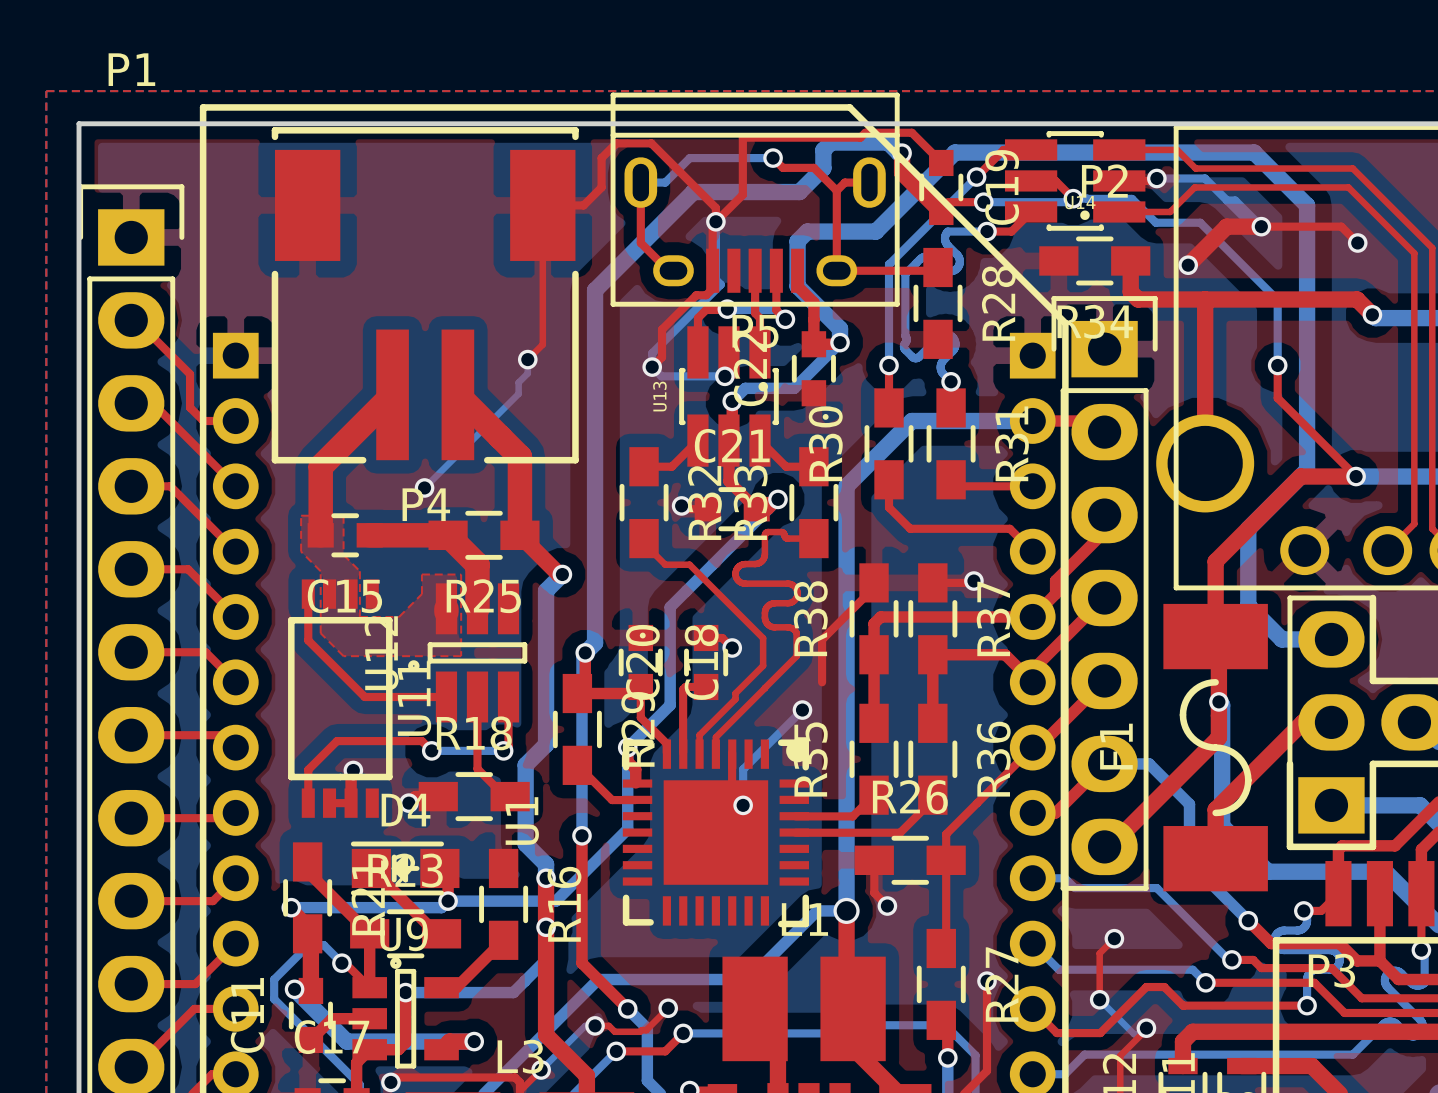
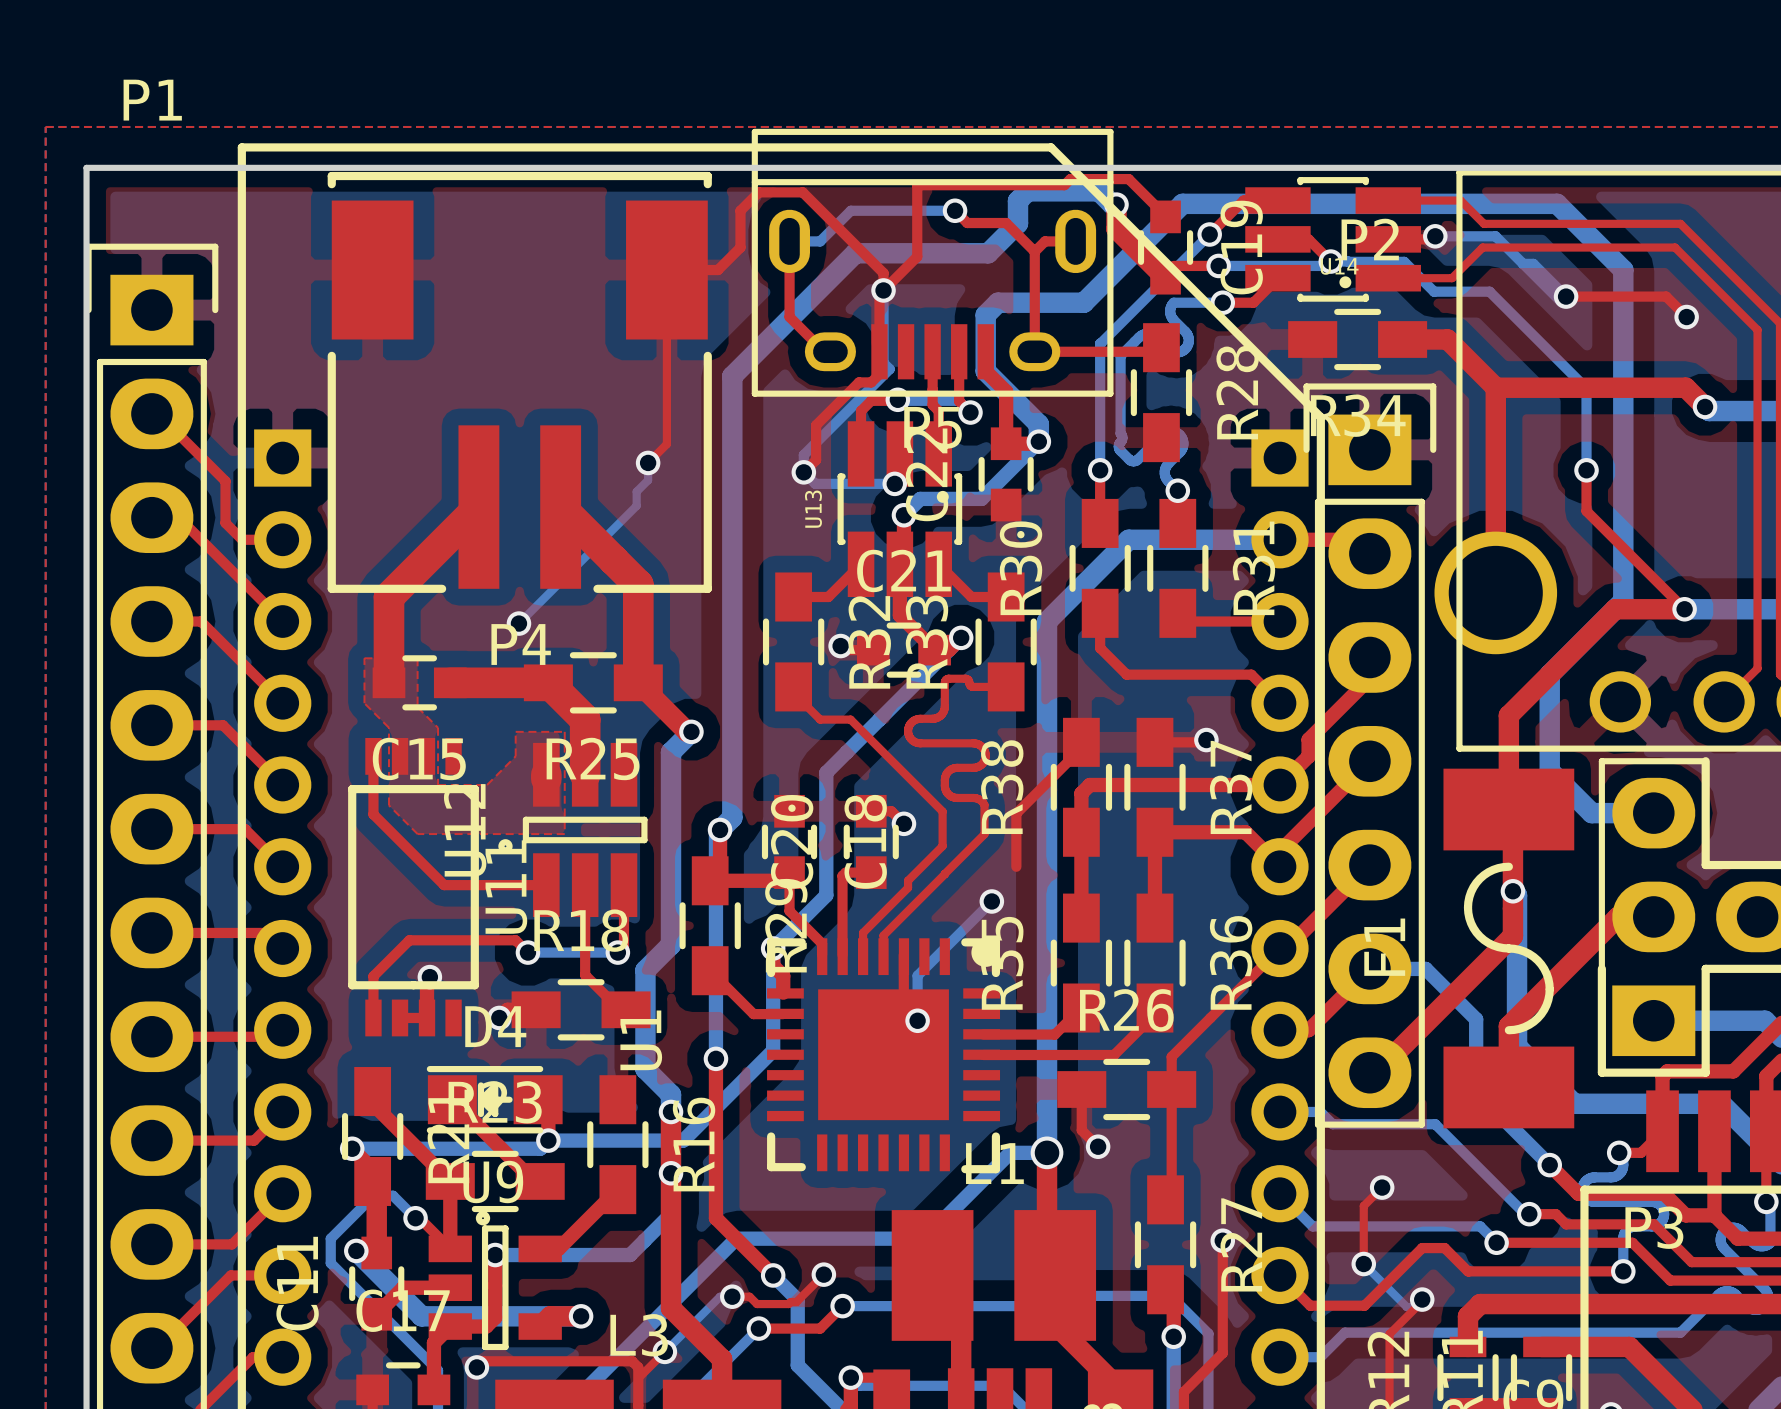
top track: (1261, 226) (1226, 226) (1188, 265) -> none
top track: (1130, 260) (1130, 291) (1138, 299) (1205, 299) -> (1402, 339) (1447, 339) (1495, 387)
via: (1188, 265) -> none

